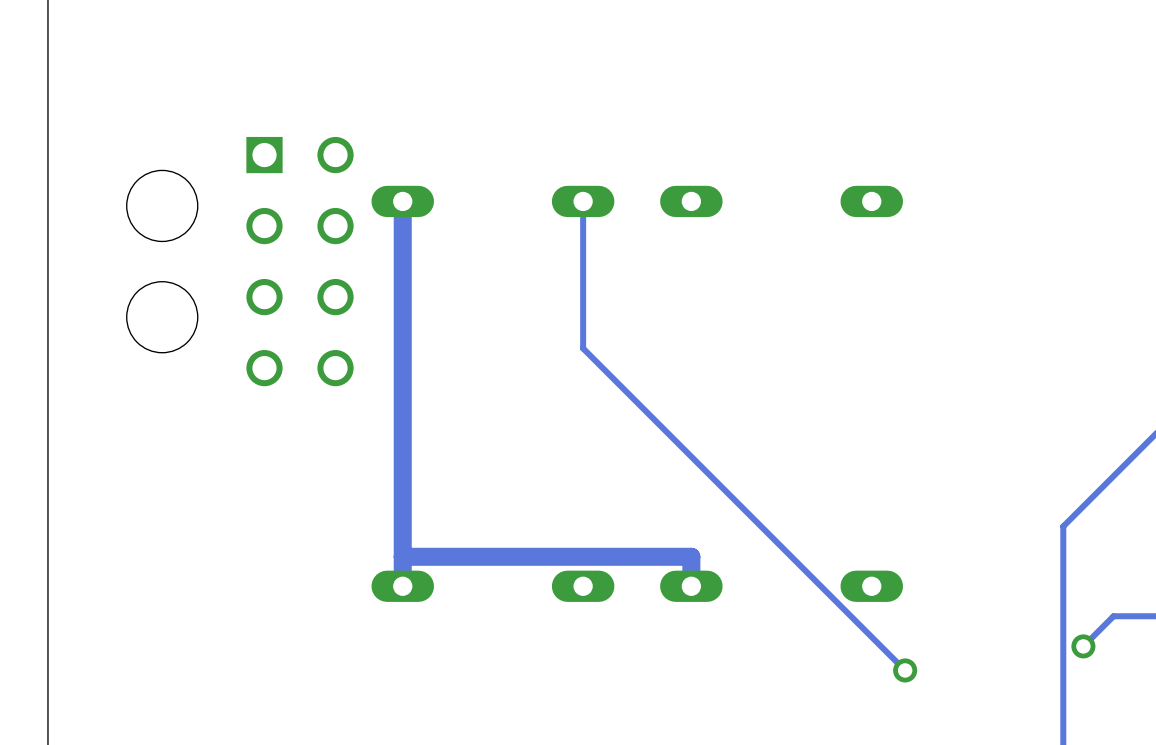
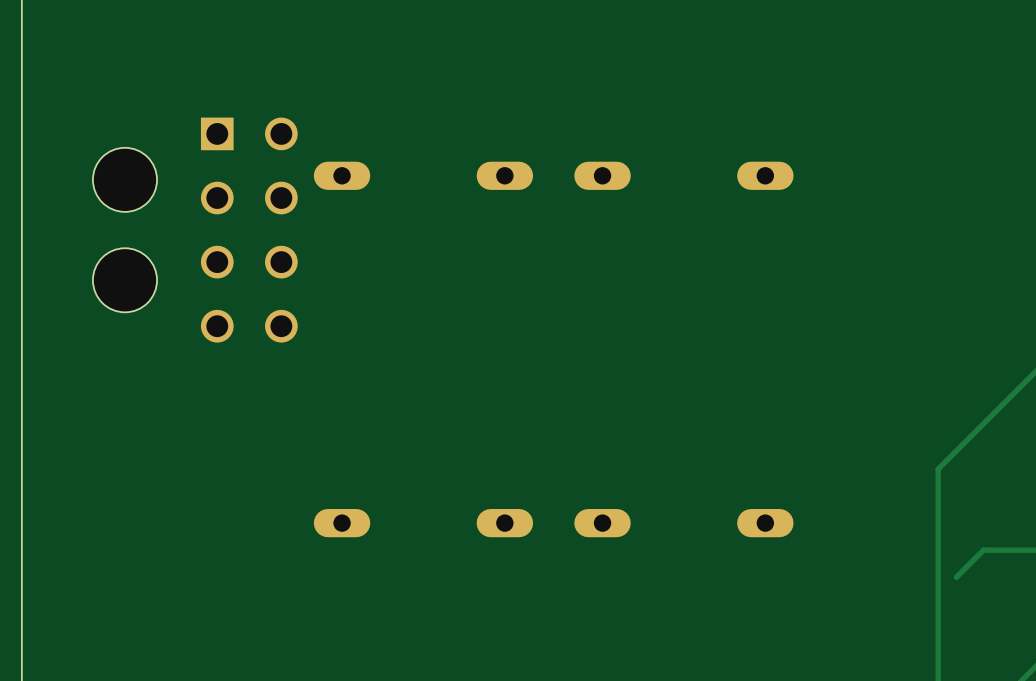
track: (402, 201) (402, 586) -> none
track: (583, 201) (583, 348) (905, 670) -> none
track: (402, 556) (691, 556) (691, 586) -> none
via: (1083, 646) -> none
via: (905, 670) -> none

